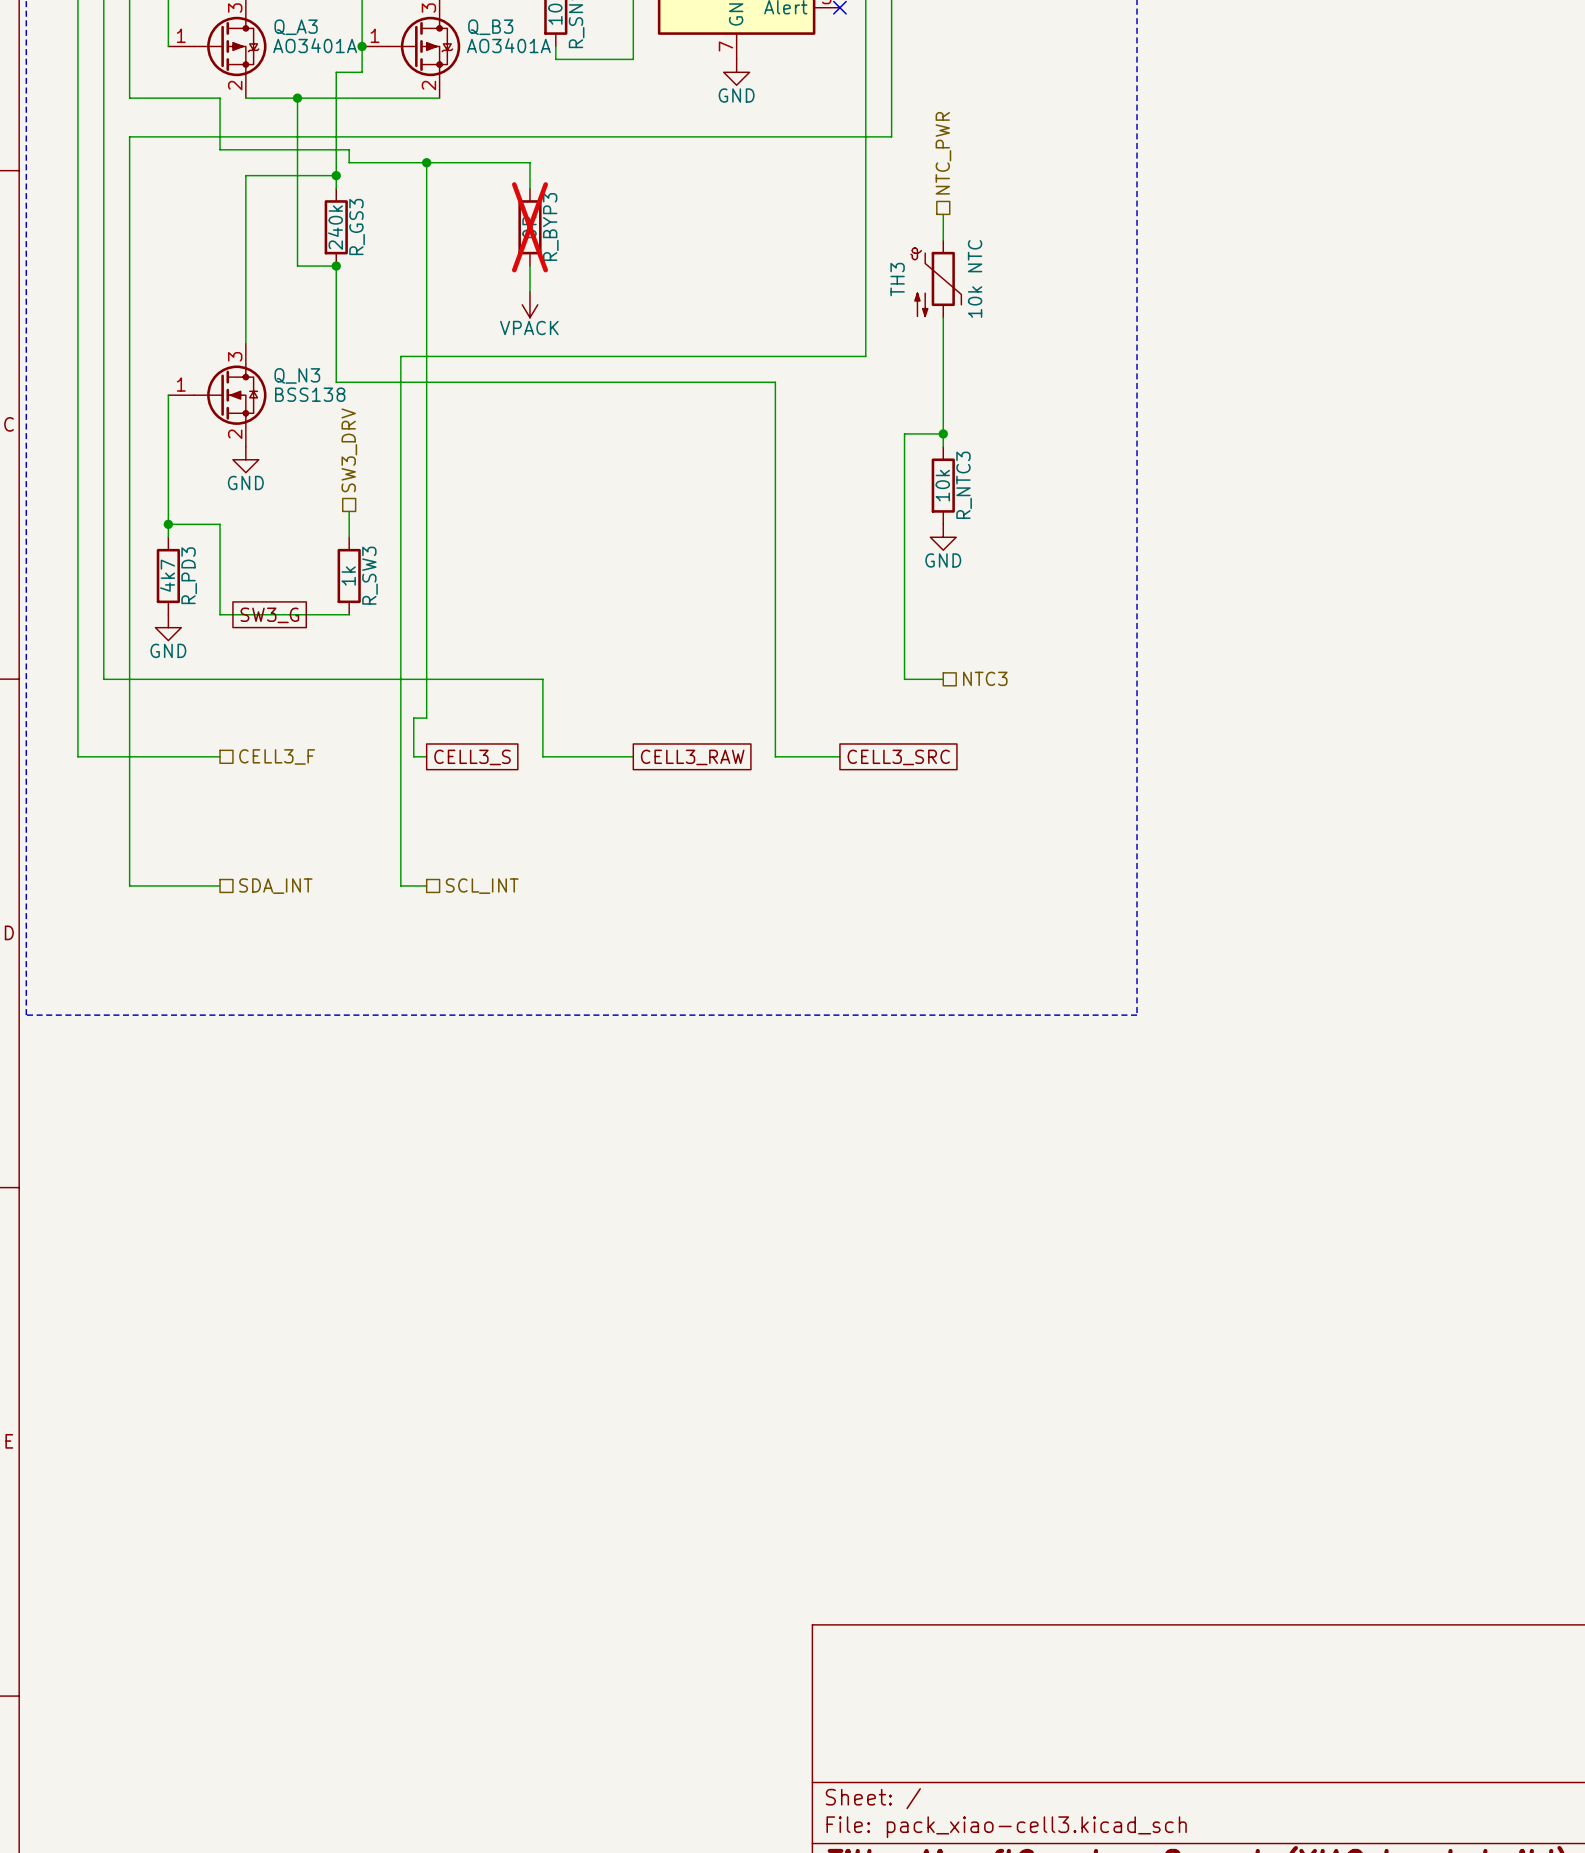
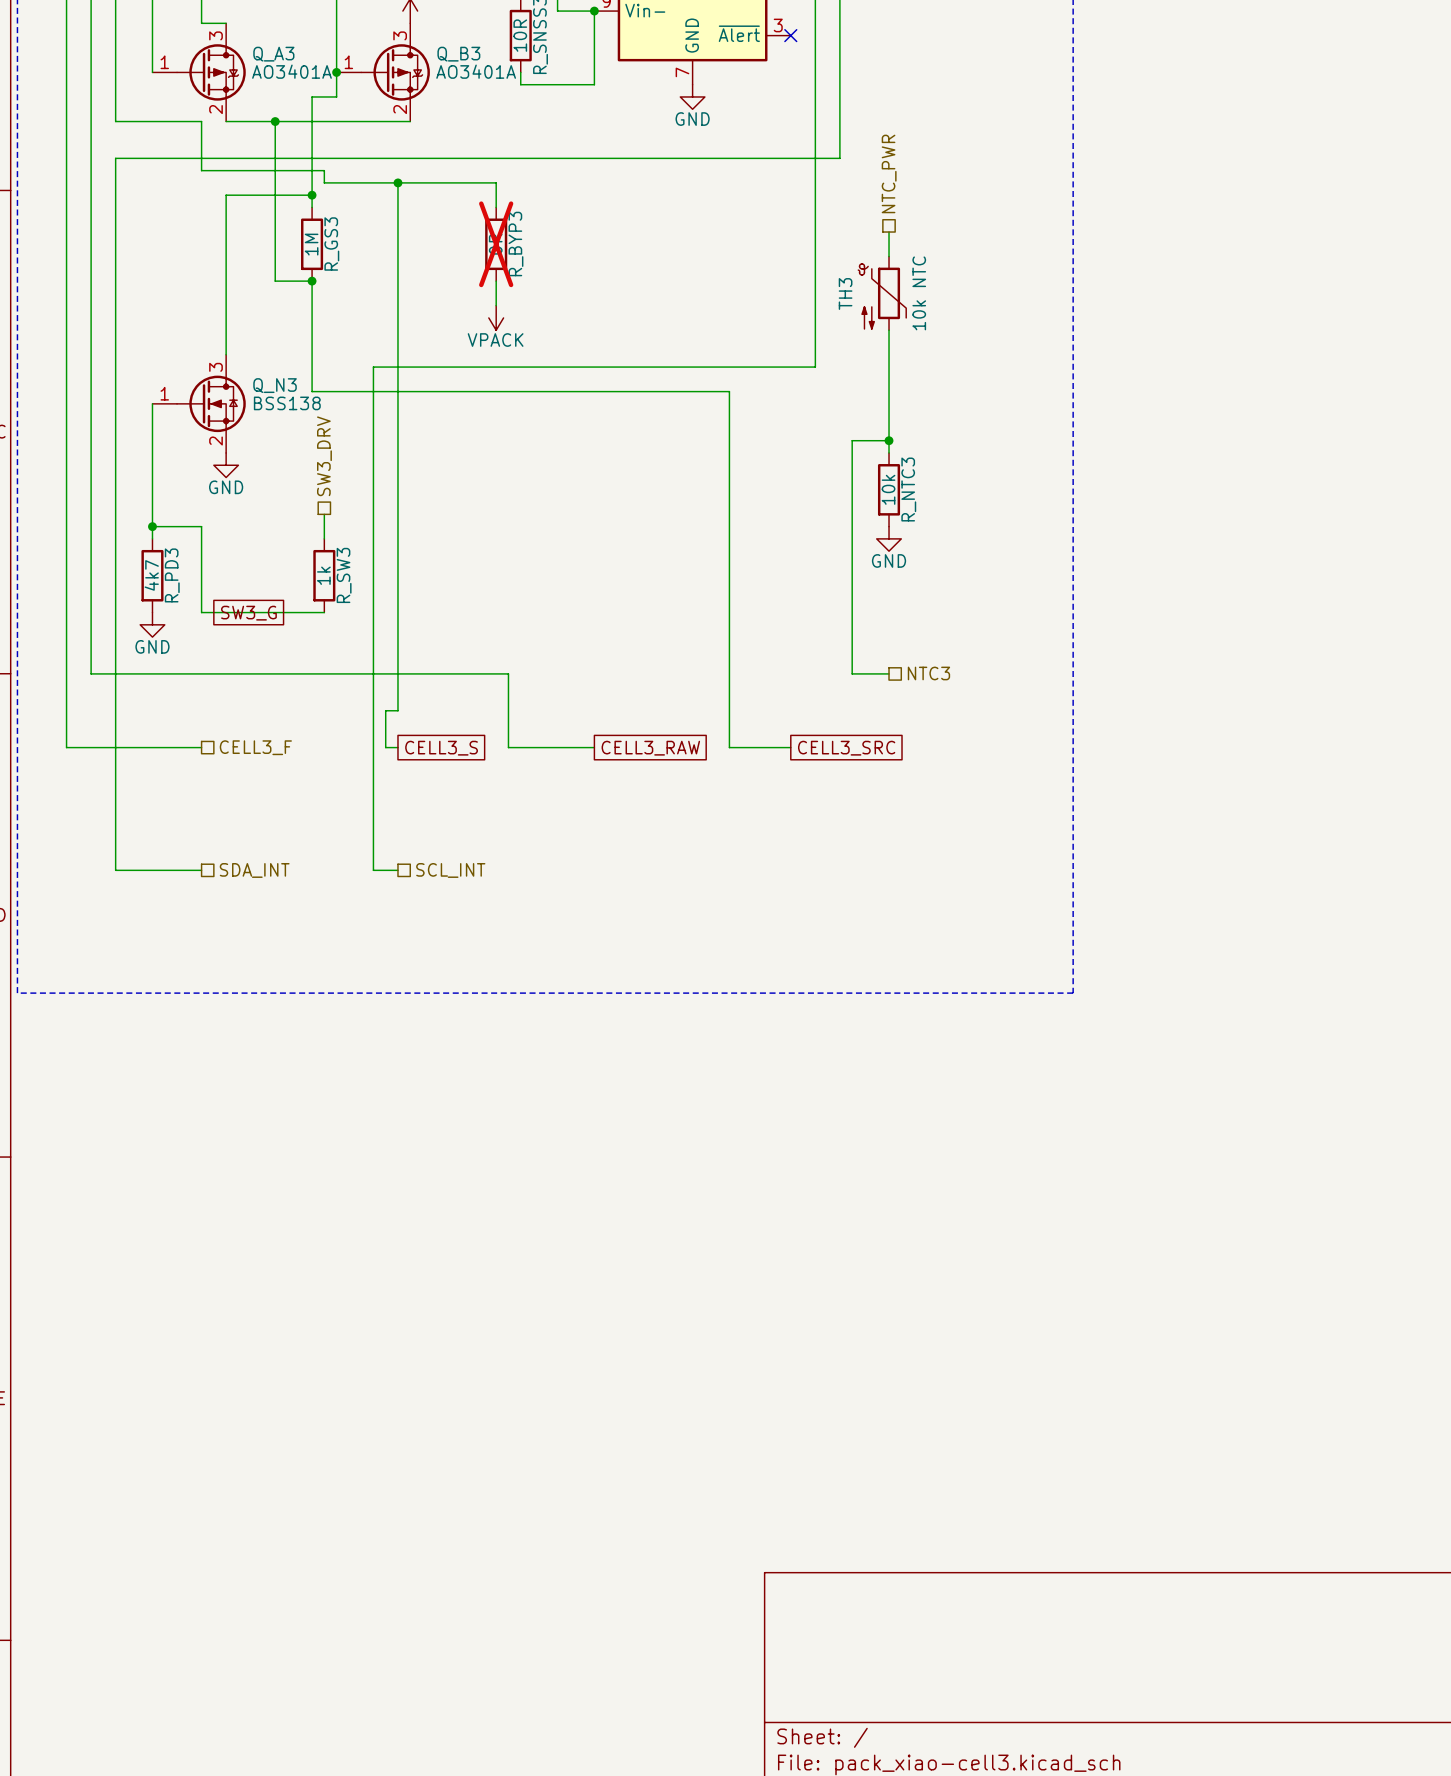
R_GS3 value: 240k (335, 227) -> 1M (311, 244)

